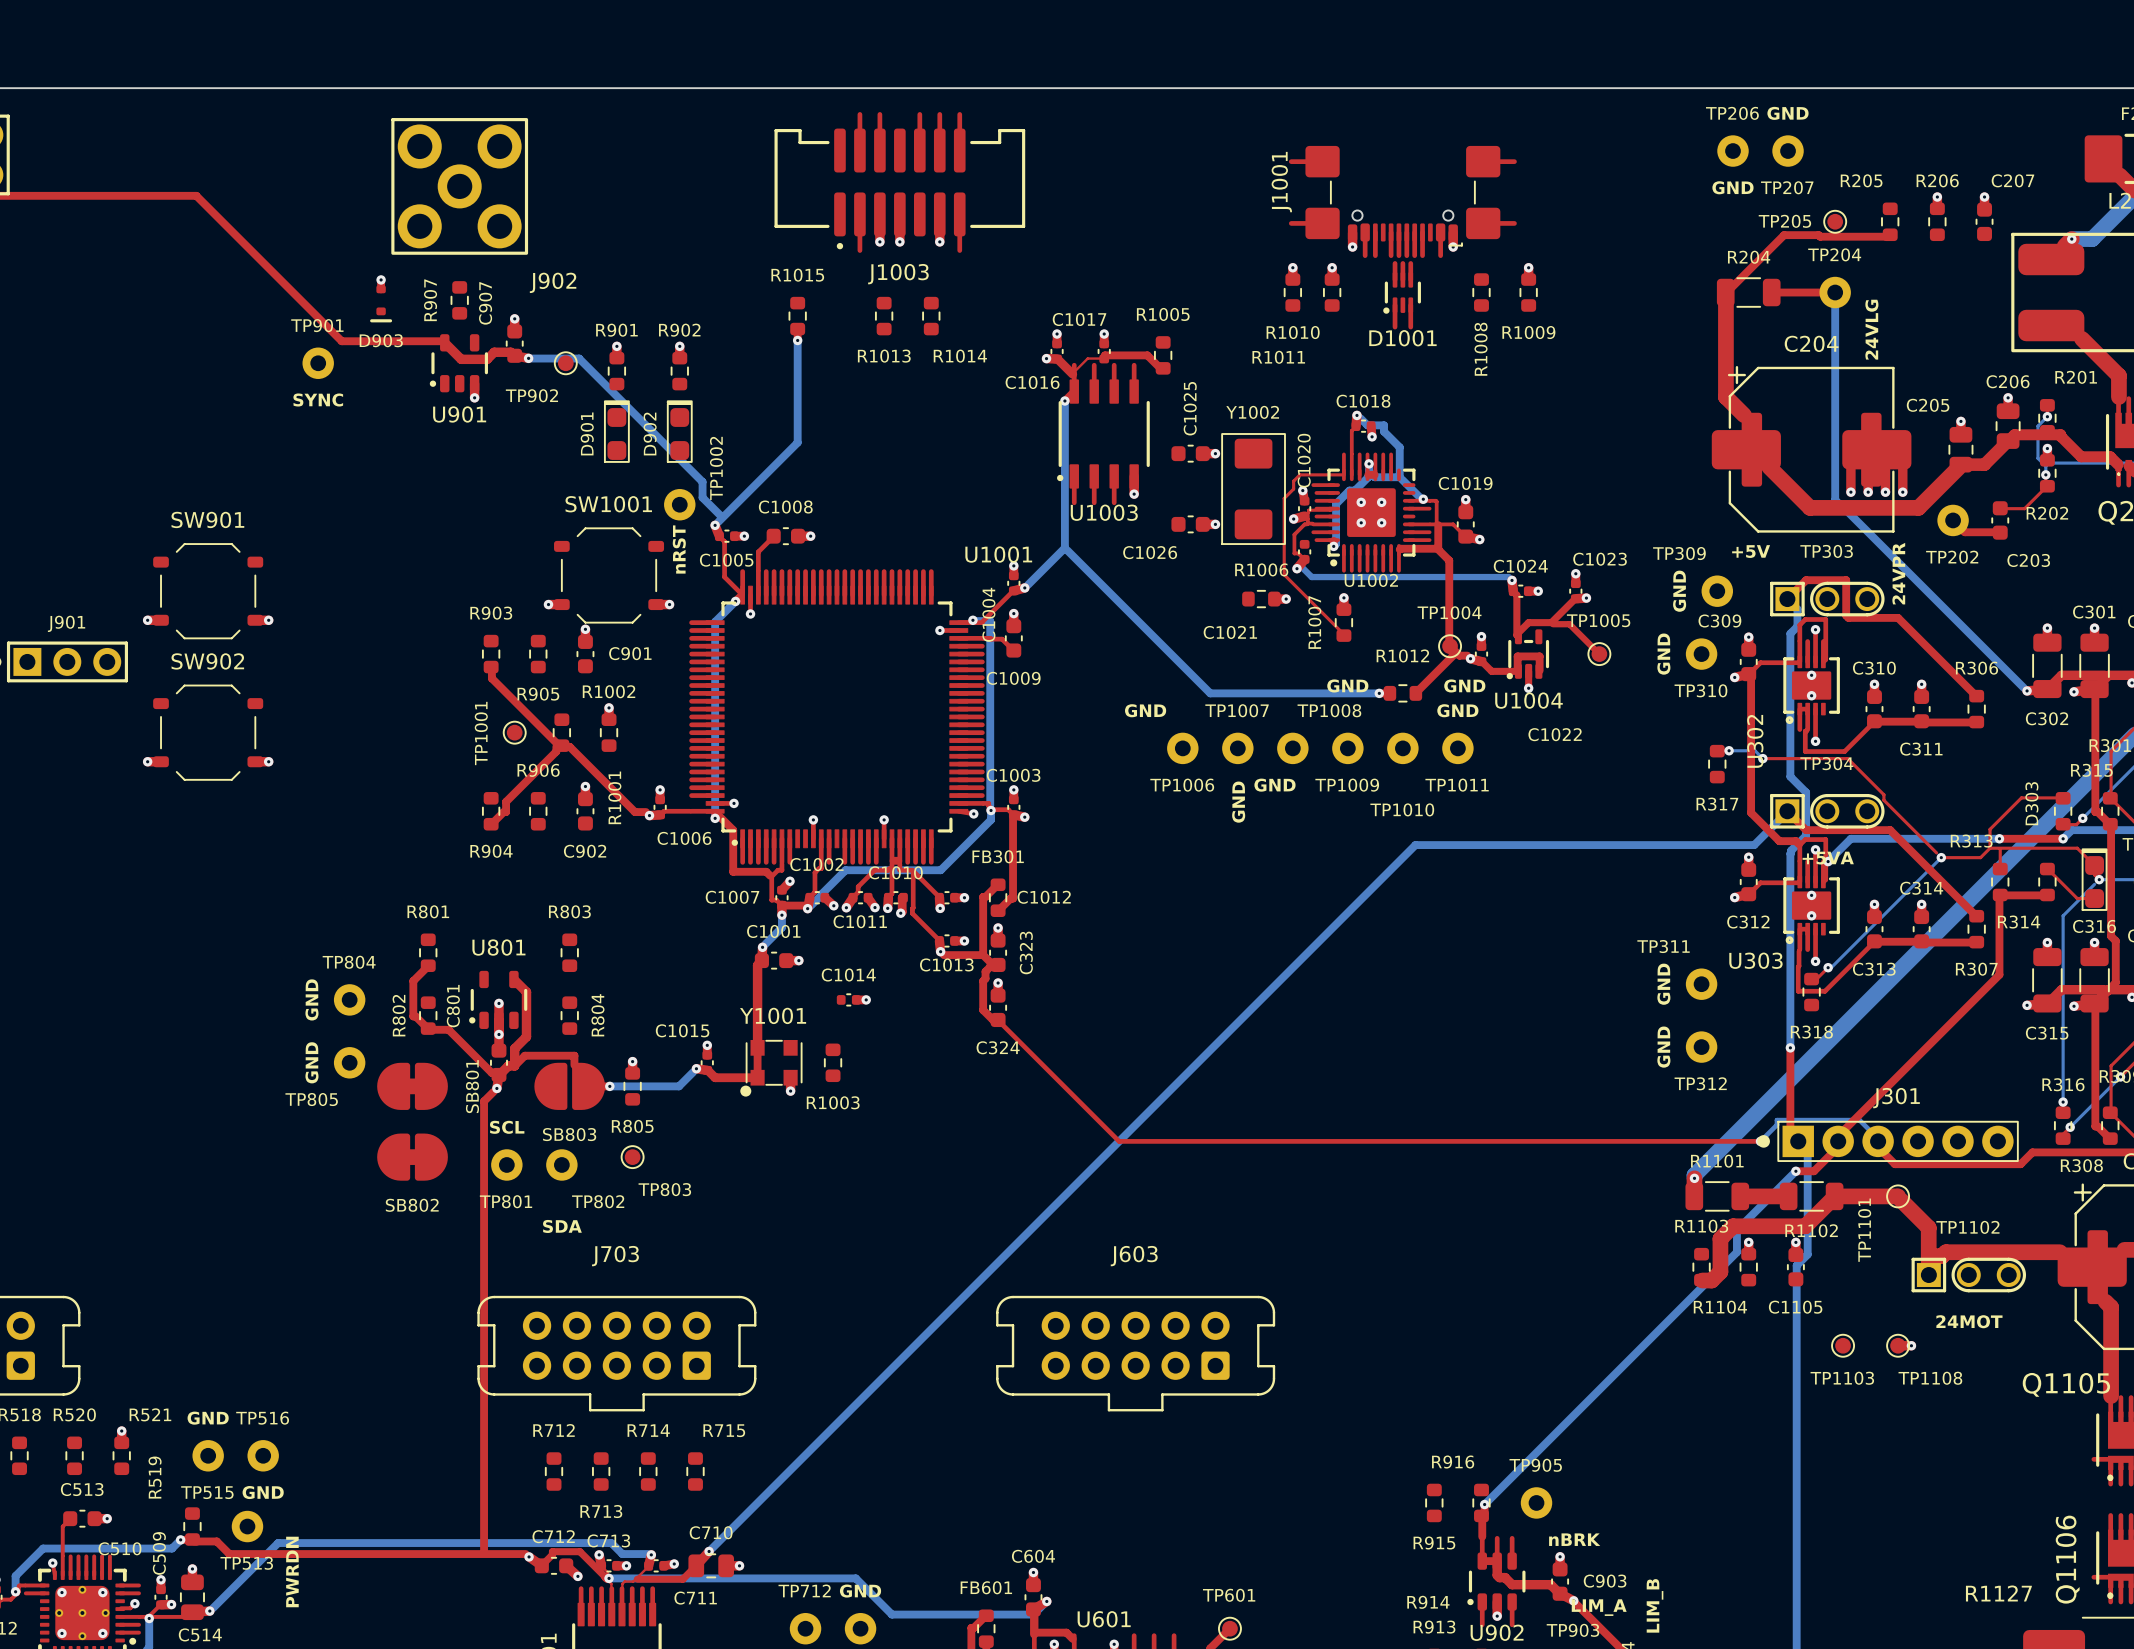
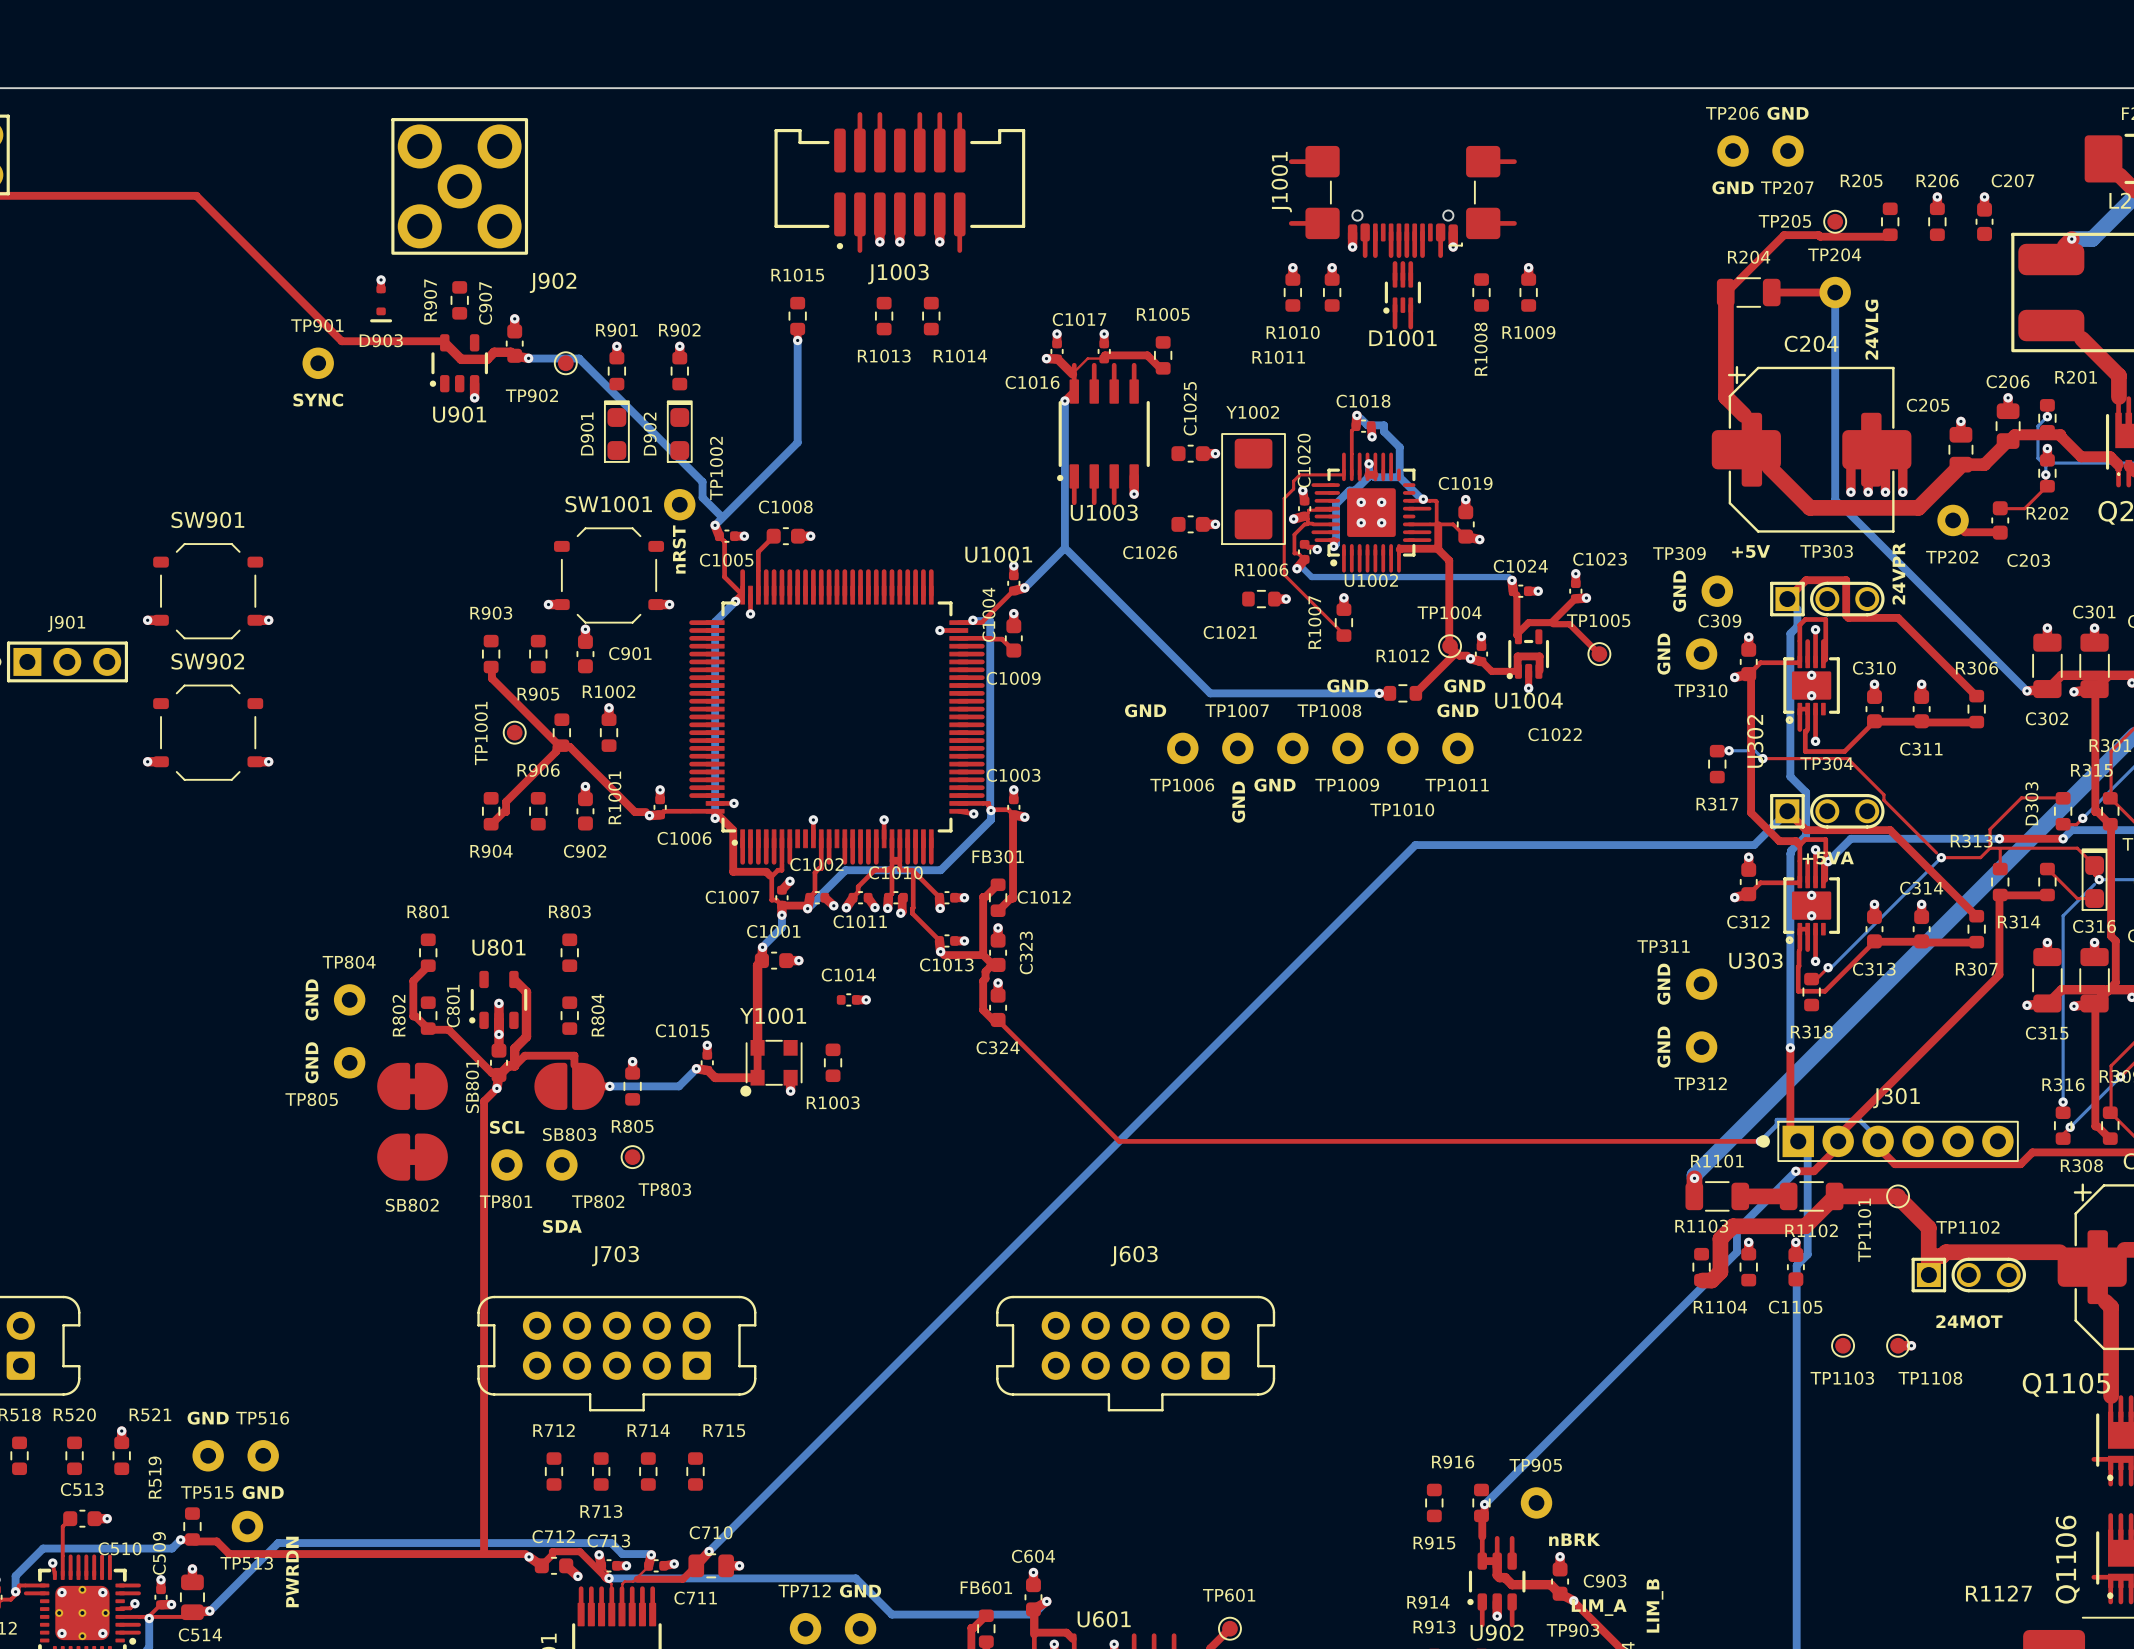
top track: none -> (1305, 544) (1307, 547) (1315, 547)
via: none -> (1317, 549)

